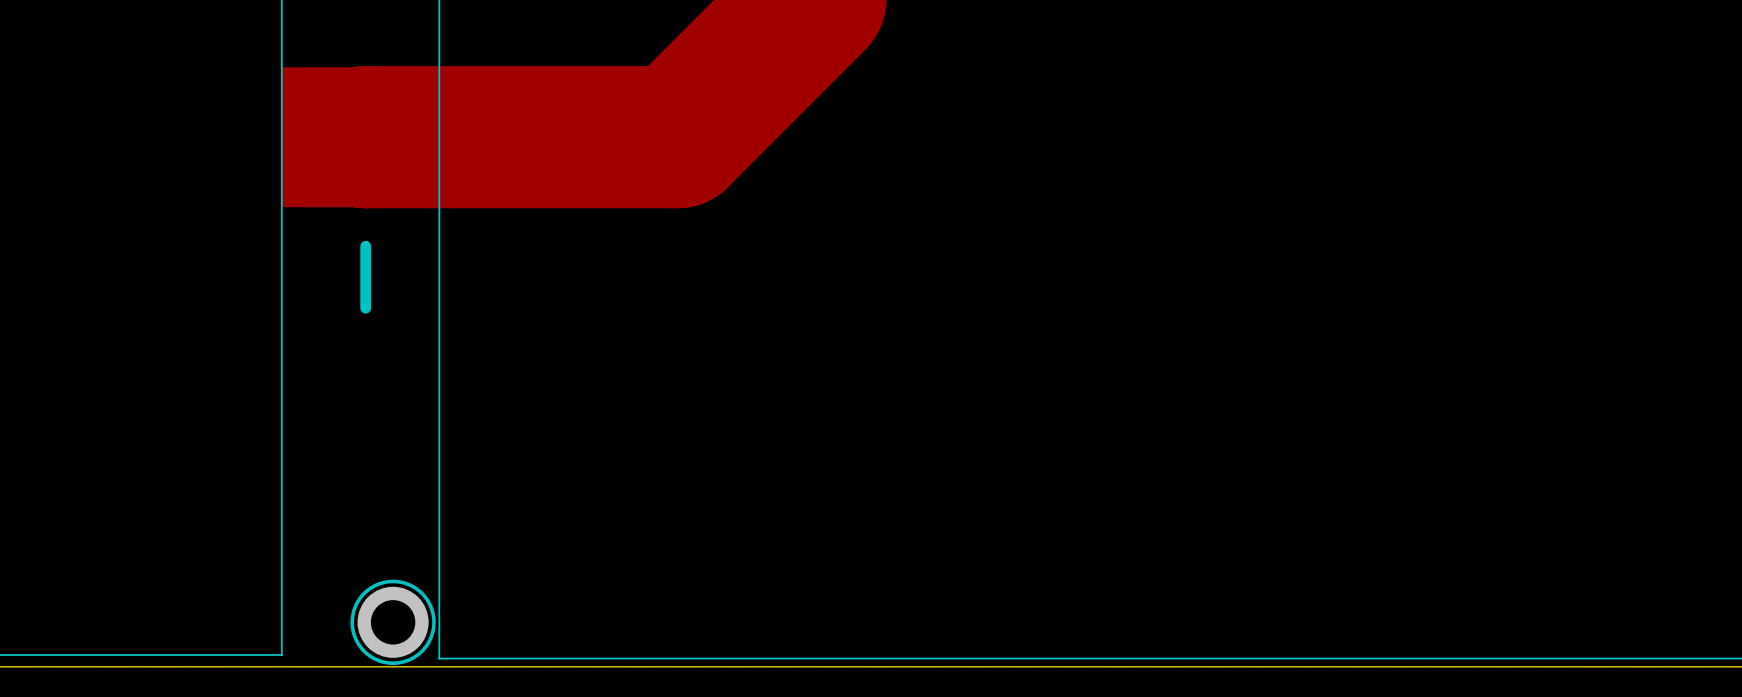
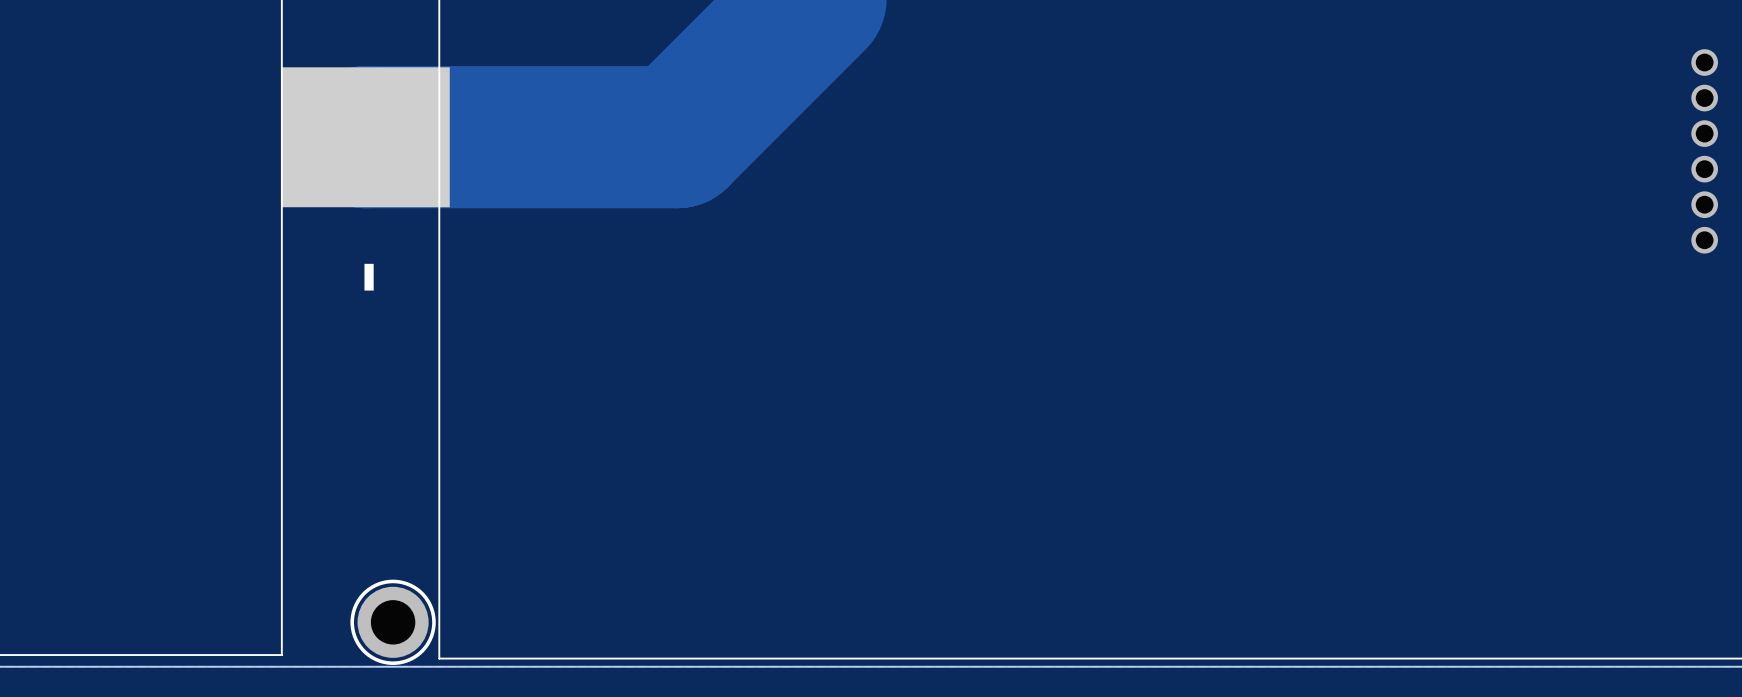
via: none -> (1704, 62)
via: none -> (1704, 98)
via: none -> (1704, 133)
via: none -> (1704, 169)
via: none -> (1704, 204)
via: none -> (1704, 240)

